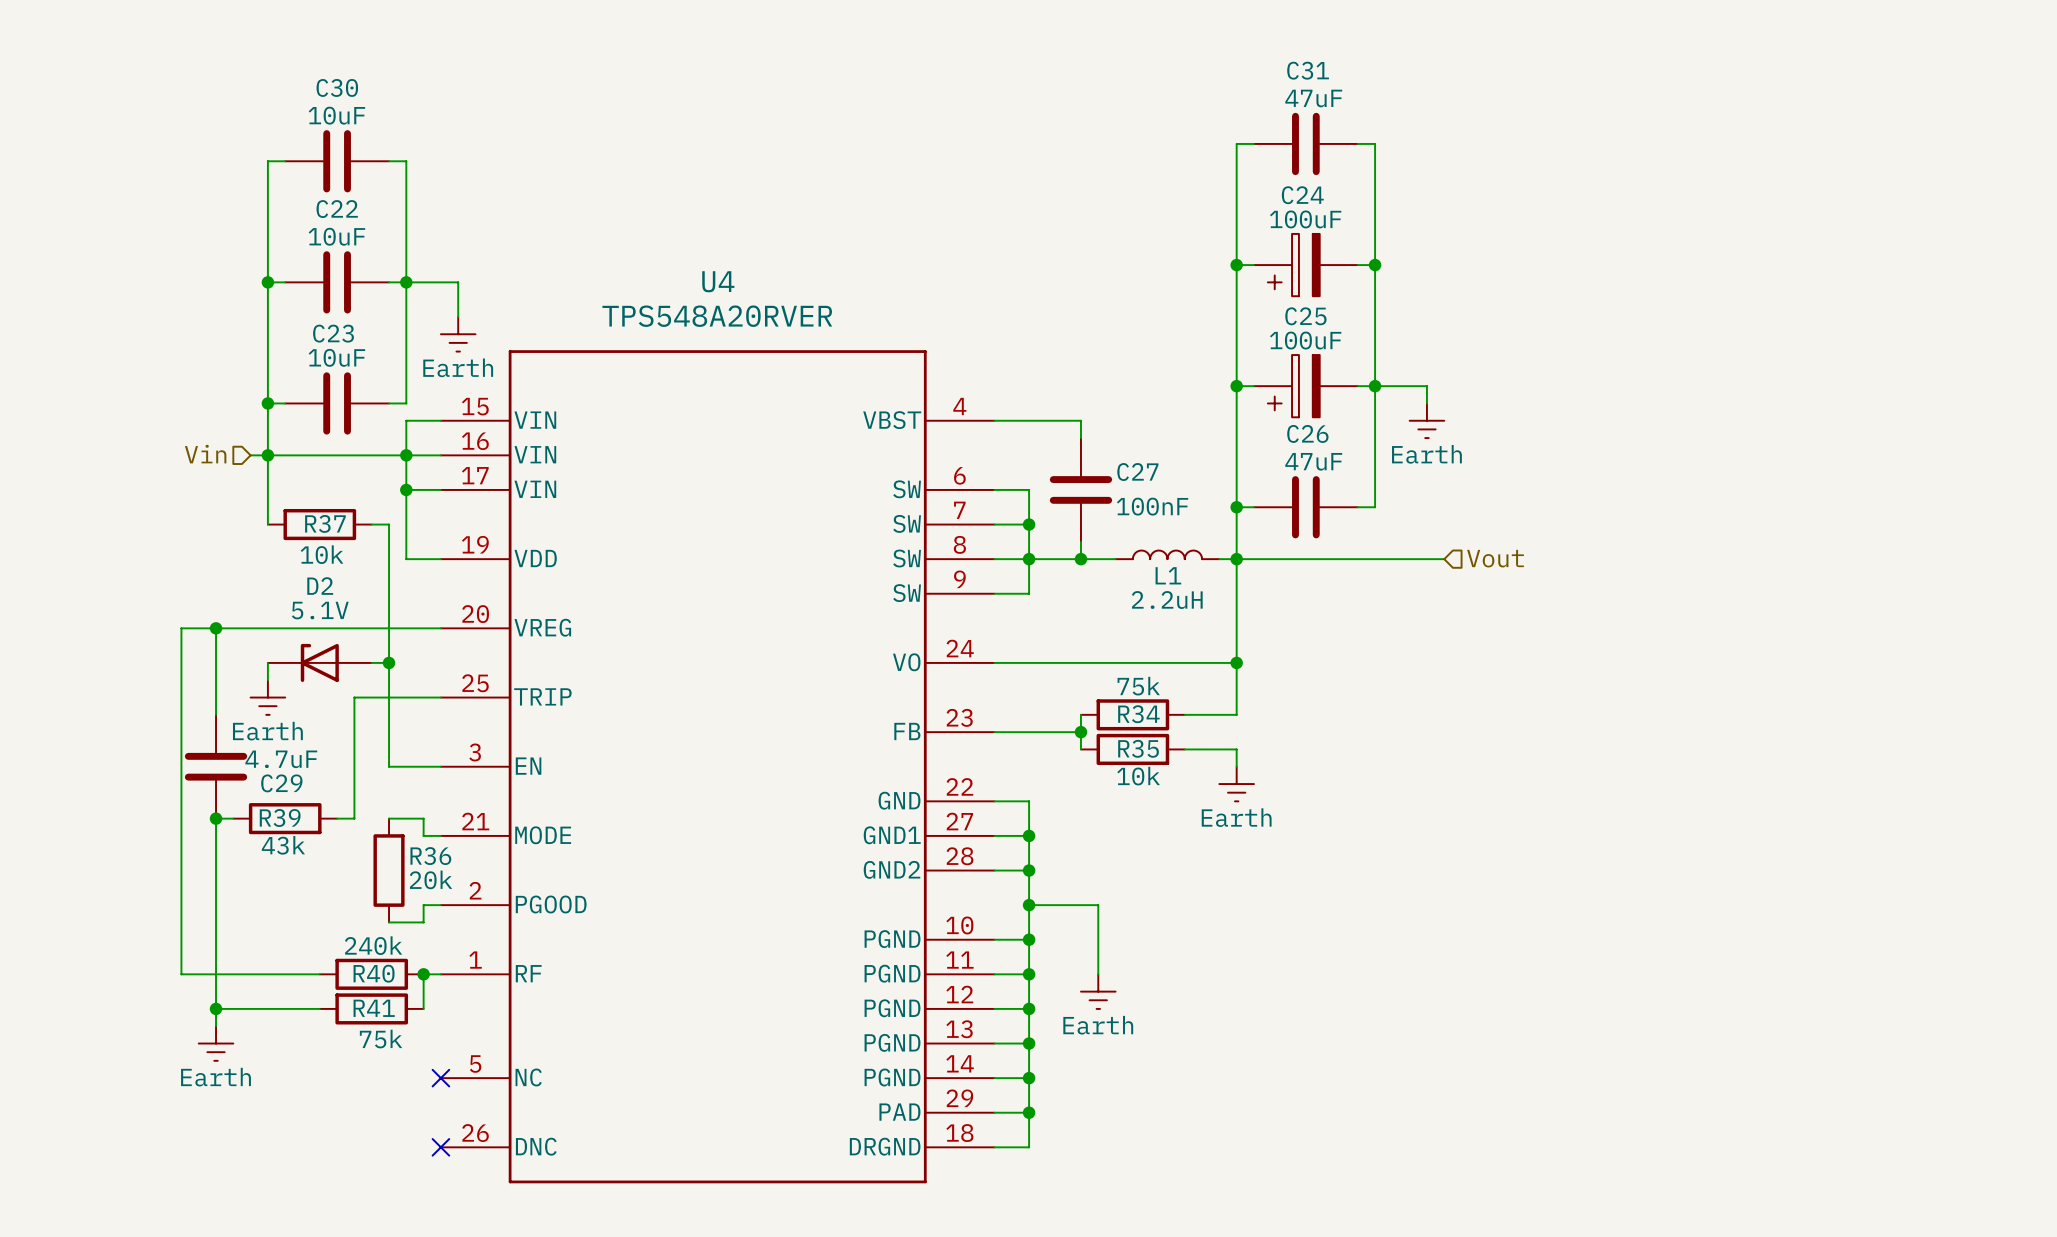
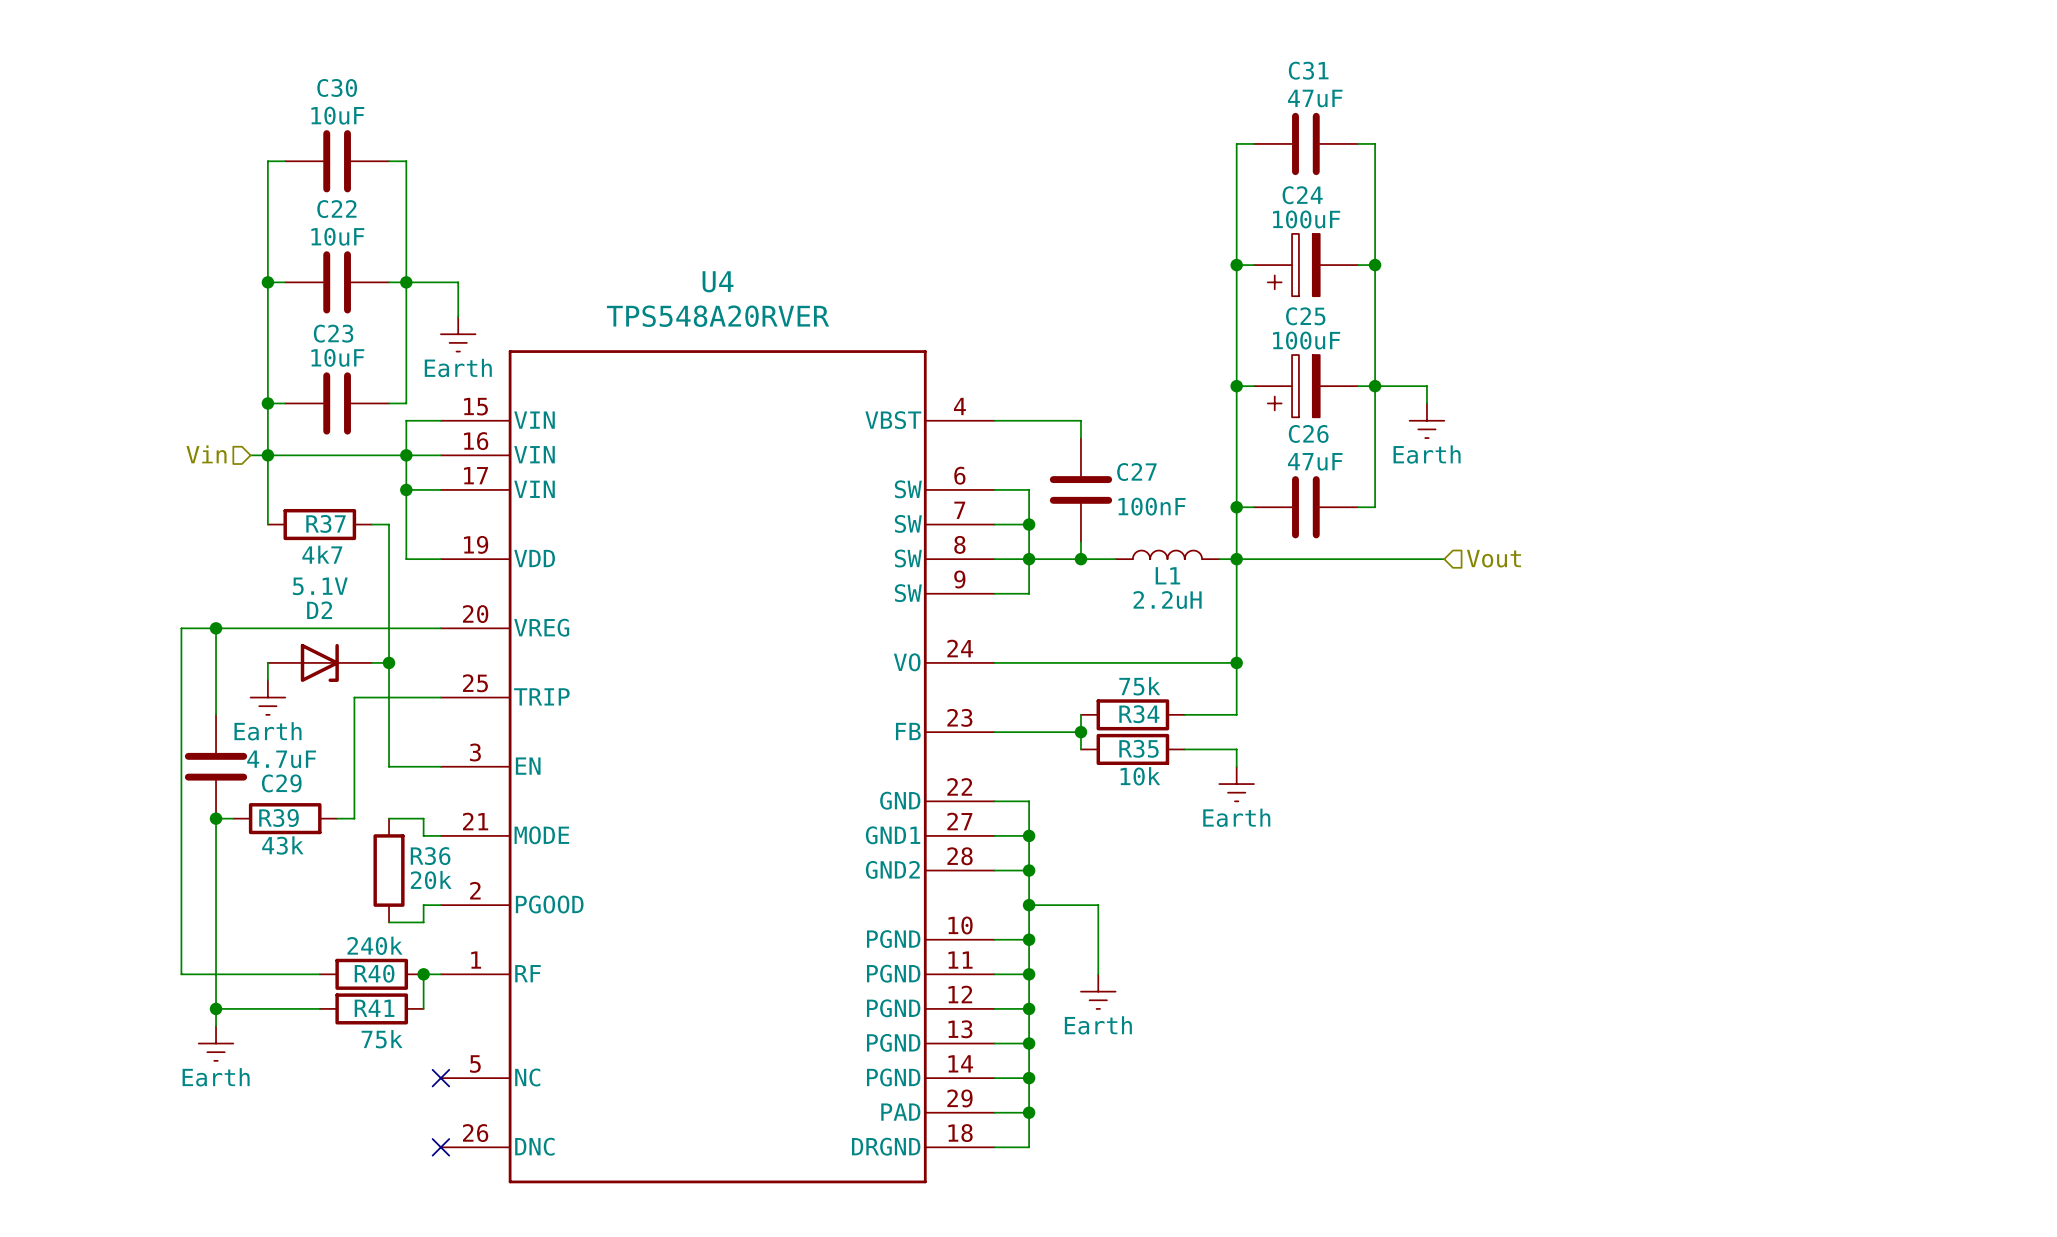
R37 value: 10k (322, 554) -> 4k7 (322, 554)
D2 rotation: 0° (319, 662) -> 180° (319, 662)

